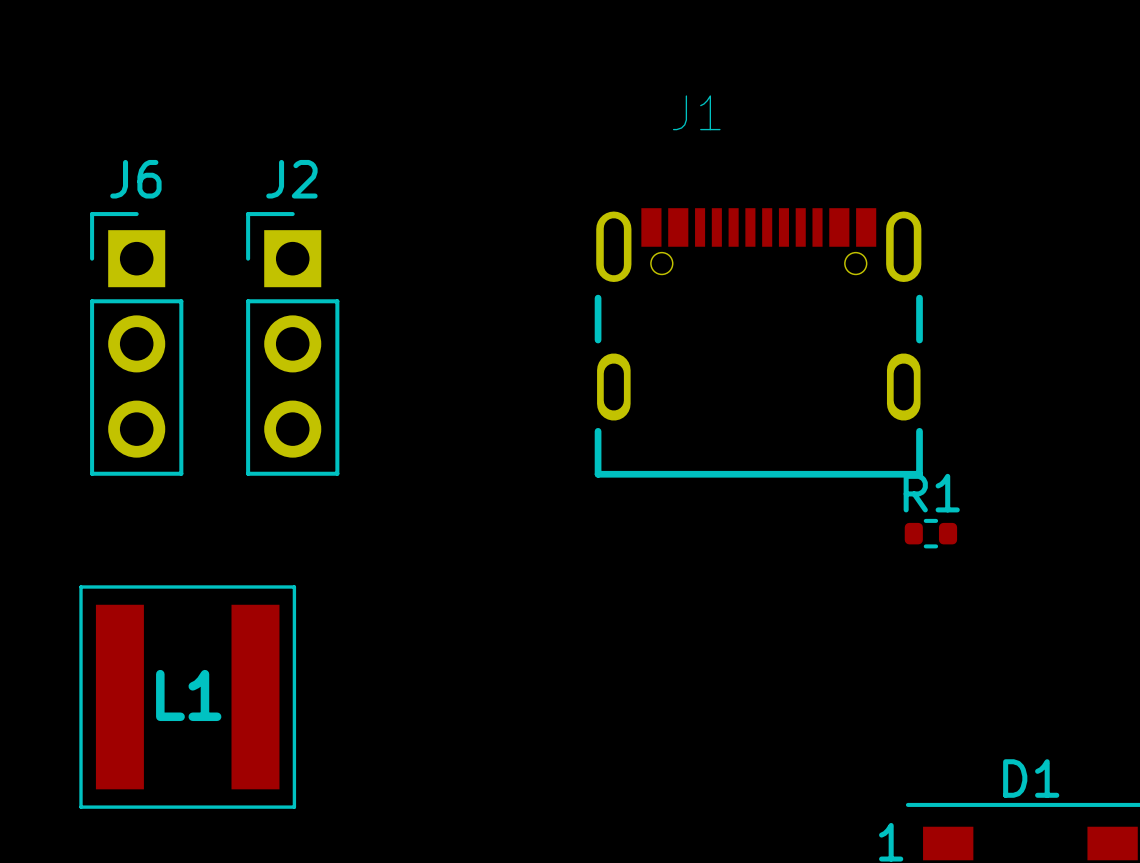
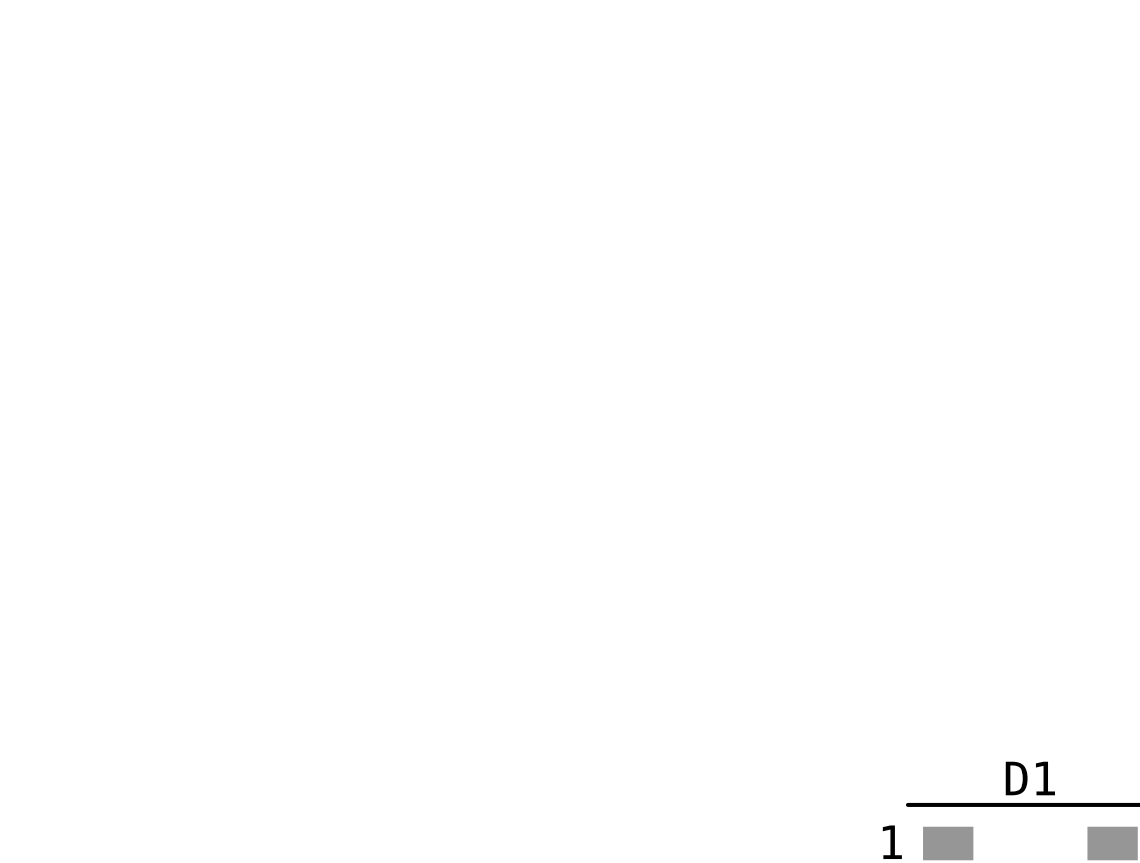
J1: (758, 342) -> none
J6: (136, 343) -> none
J2: (292, 343) -> none
R1: (930, 533) -> none
L1: (187, 697) -> none

